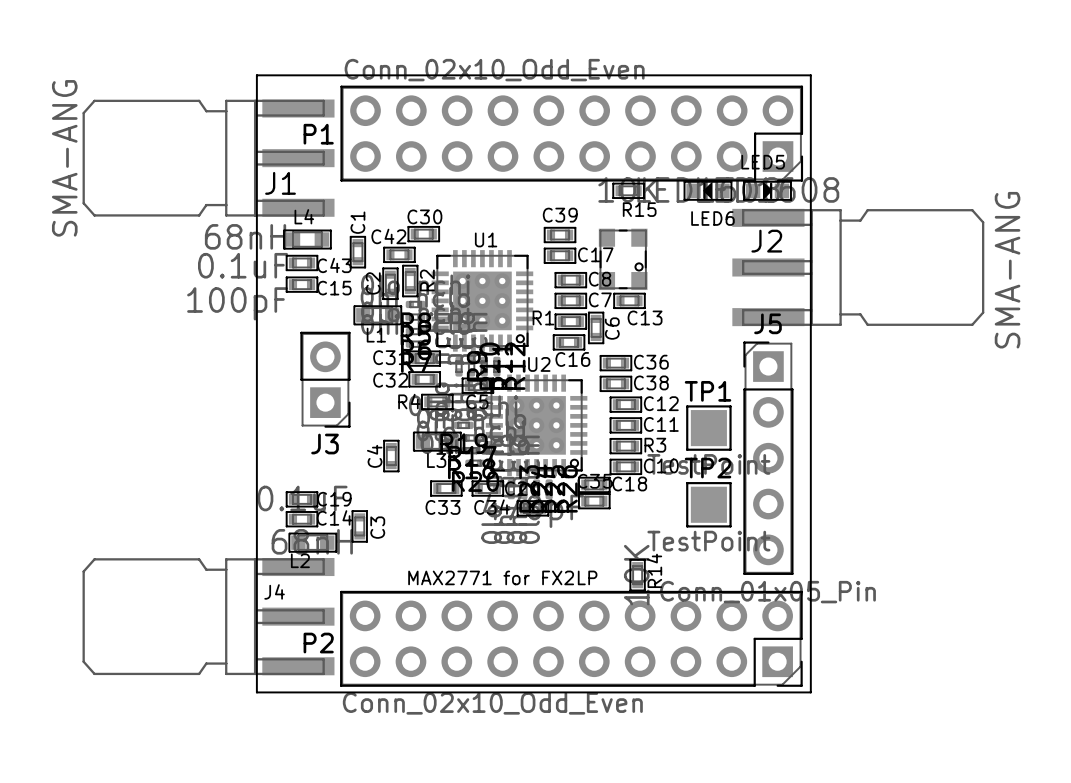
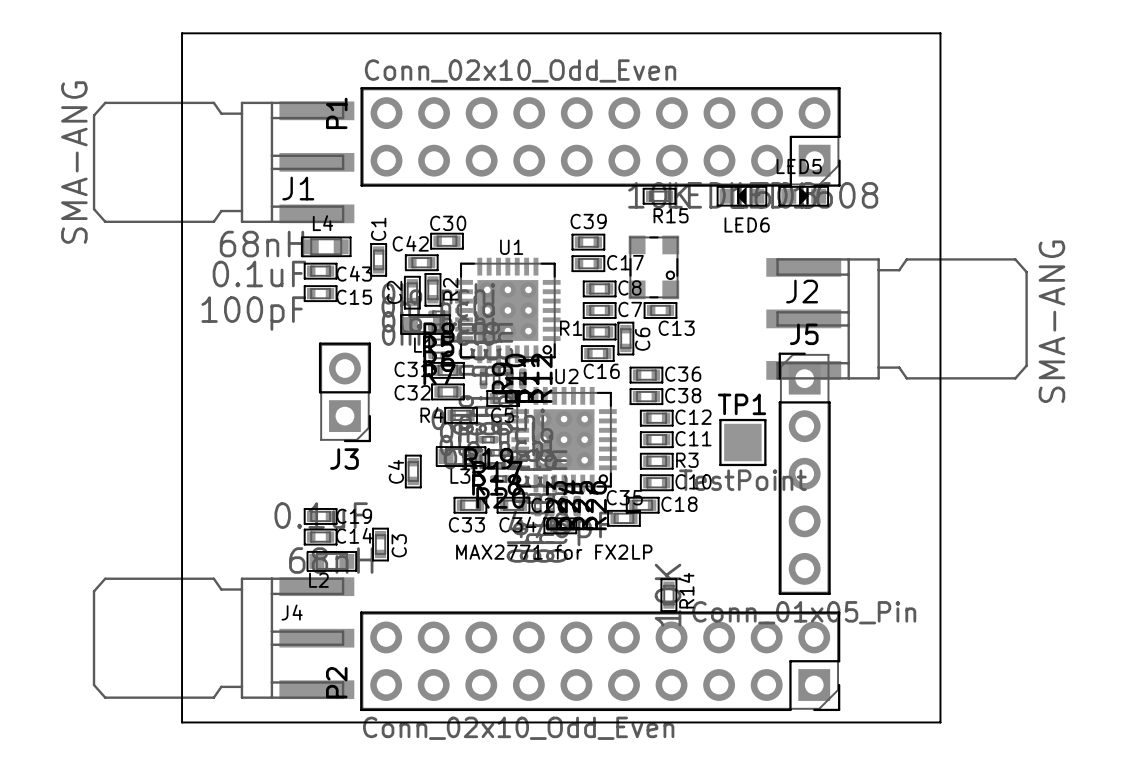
board edge: (256, 75) (810, 75) (810, 692) (256, 692) (256, 75) -> (182, 33) (182, 722) (940, 722) (940, 33) (182, 33)
P1 name rotation: 0° (318, 134) -> 90° counterclockwise (336, 113)
J2 position: (858, 267) -> (897, 318)
L1 position: (377, 315) -> (425, 324)
C18 position: (594, 484) -> (642, 505)
TP2: TestPoint (708, 504) -> none
text position: MAX2771 for FX2LP (502, 577) -> MAX2771 for FX2LP (554, 552)
P2 name rotation: 0° (318, 643) -> 90° counterclockwise (336, 682)

